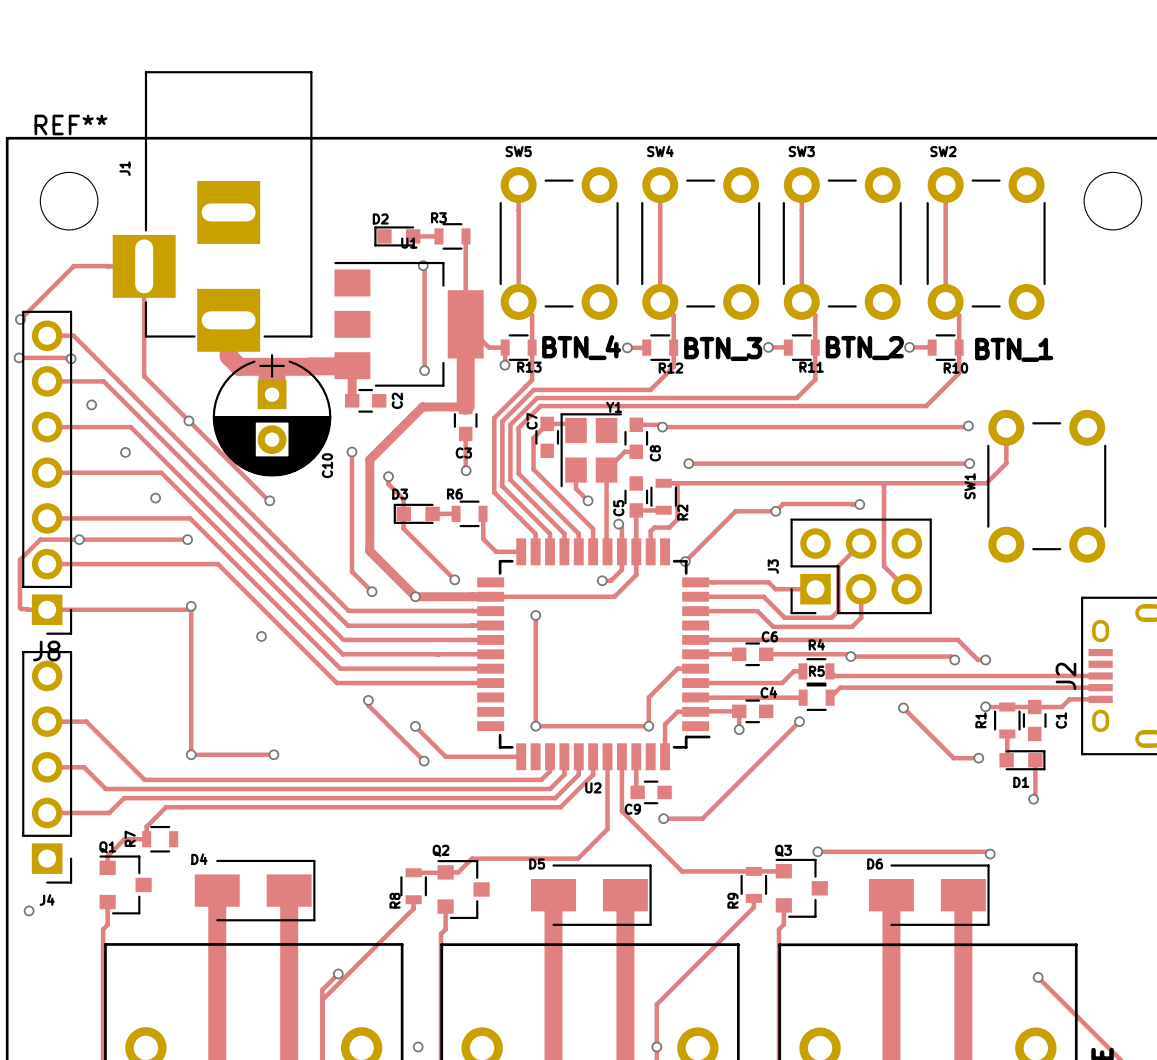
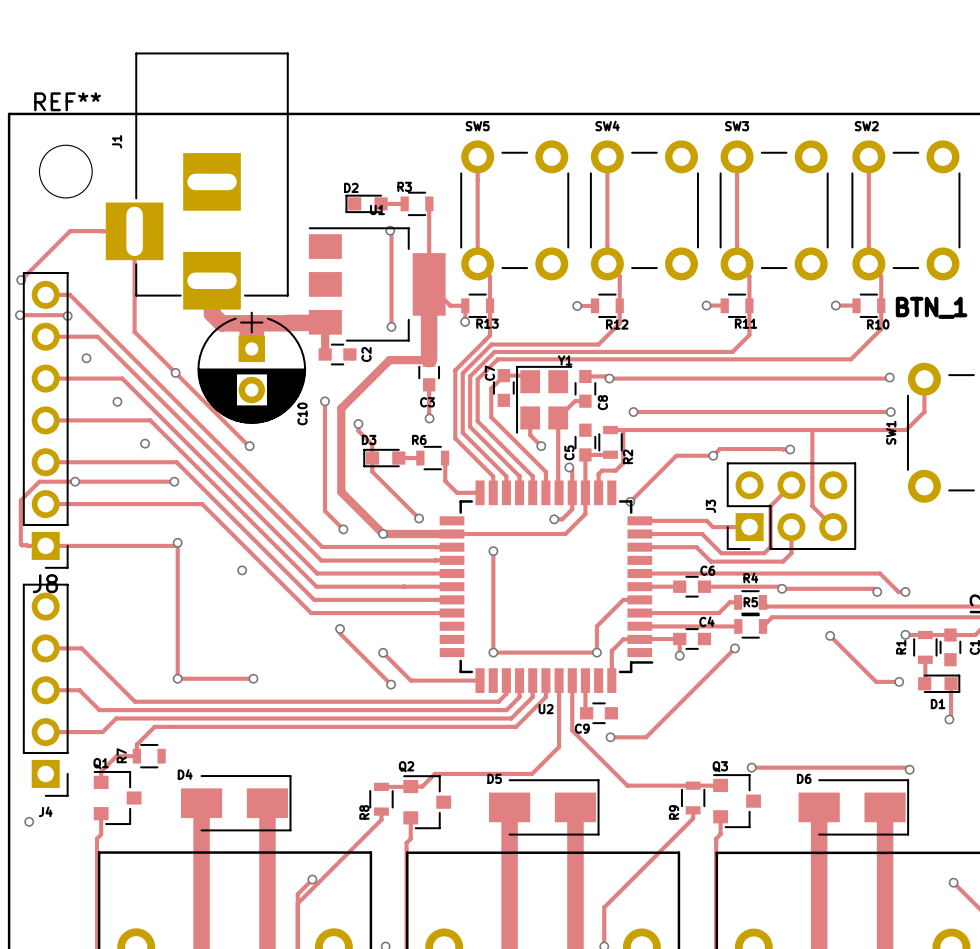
text: BTN_4 (581, 347) -> none
text: BTN_3 (723, 348) -> none
text: BTN_2 (864, 348) -> none

